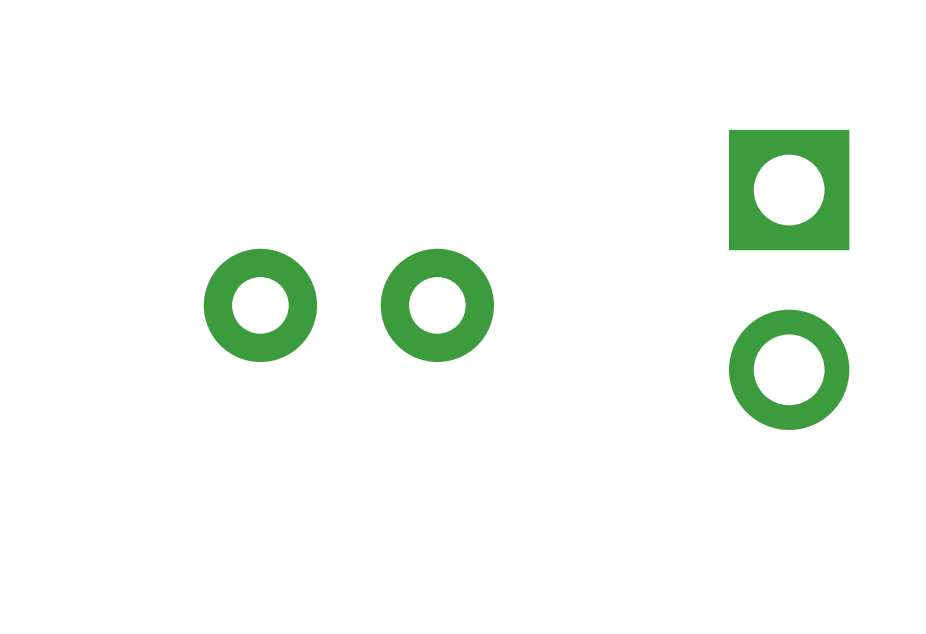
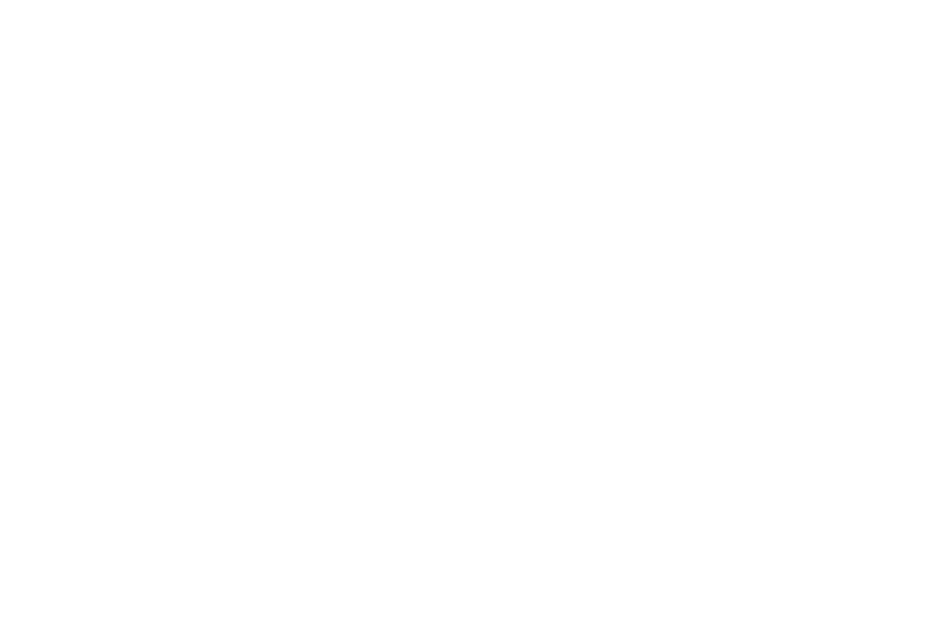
part: (789, 279) -> none
part: (348, 305) -> none

